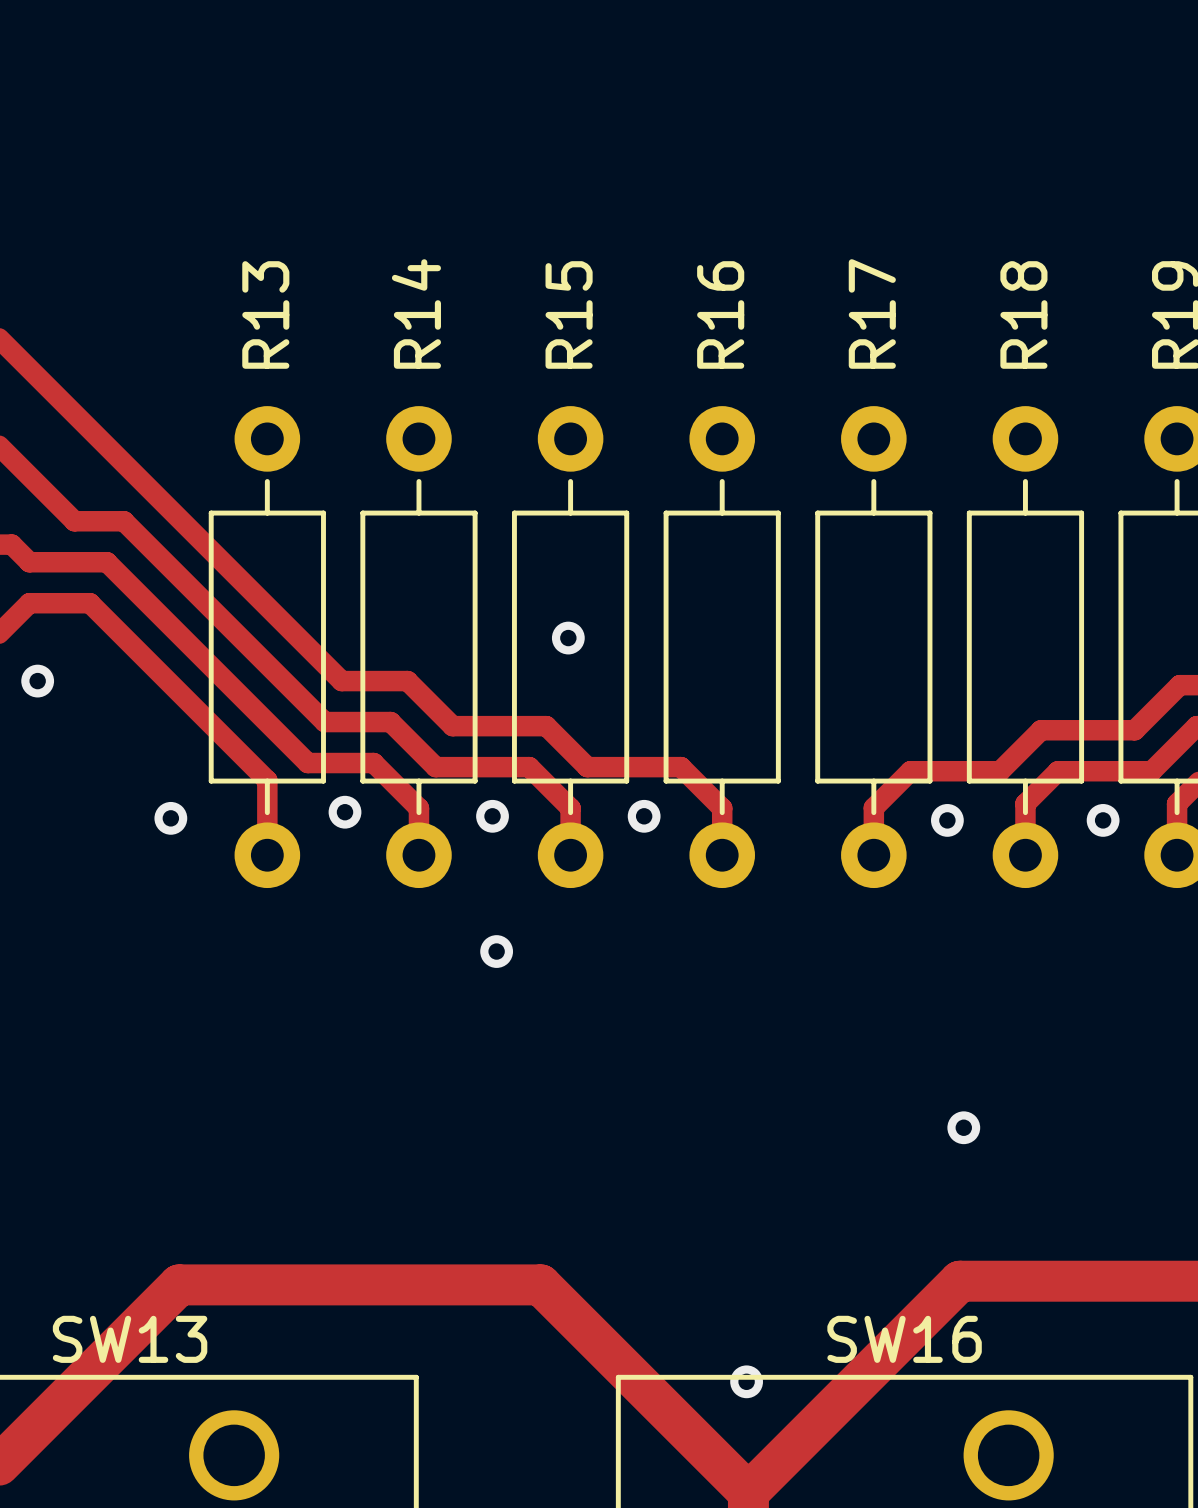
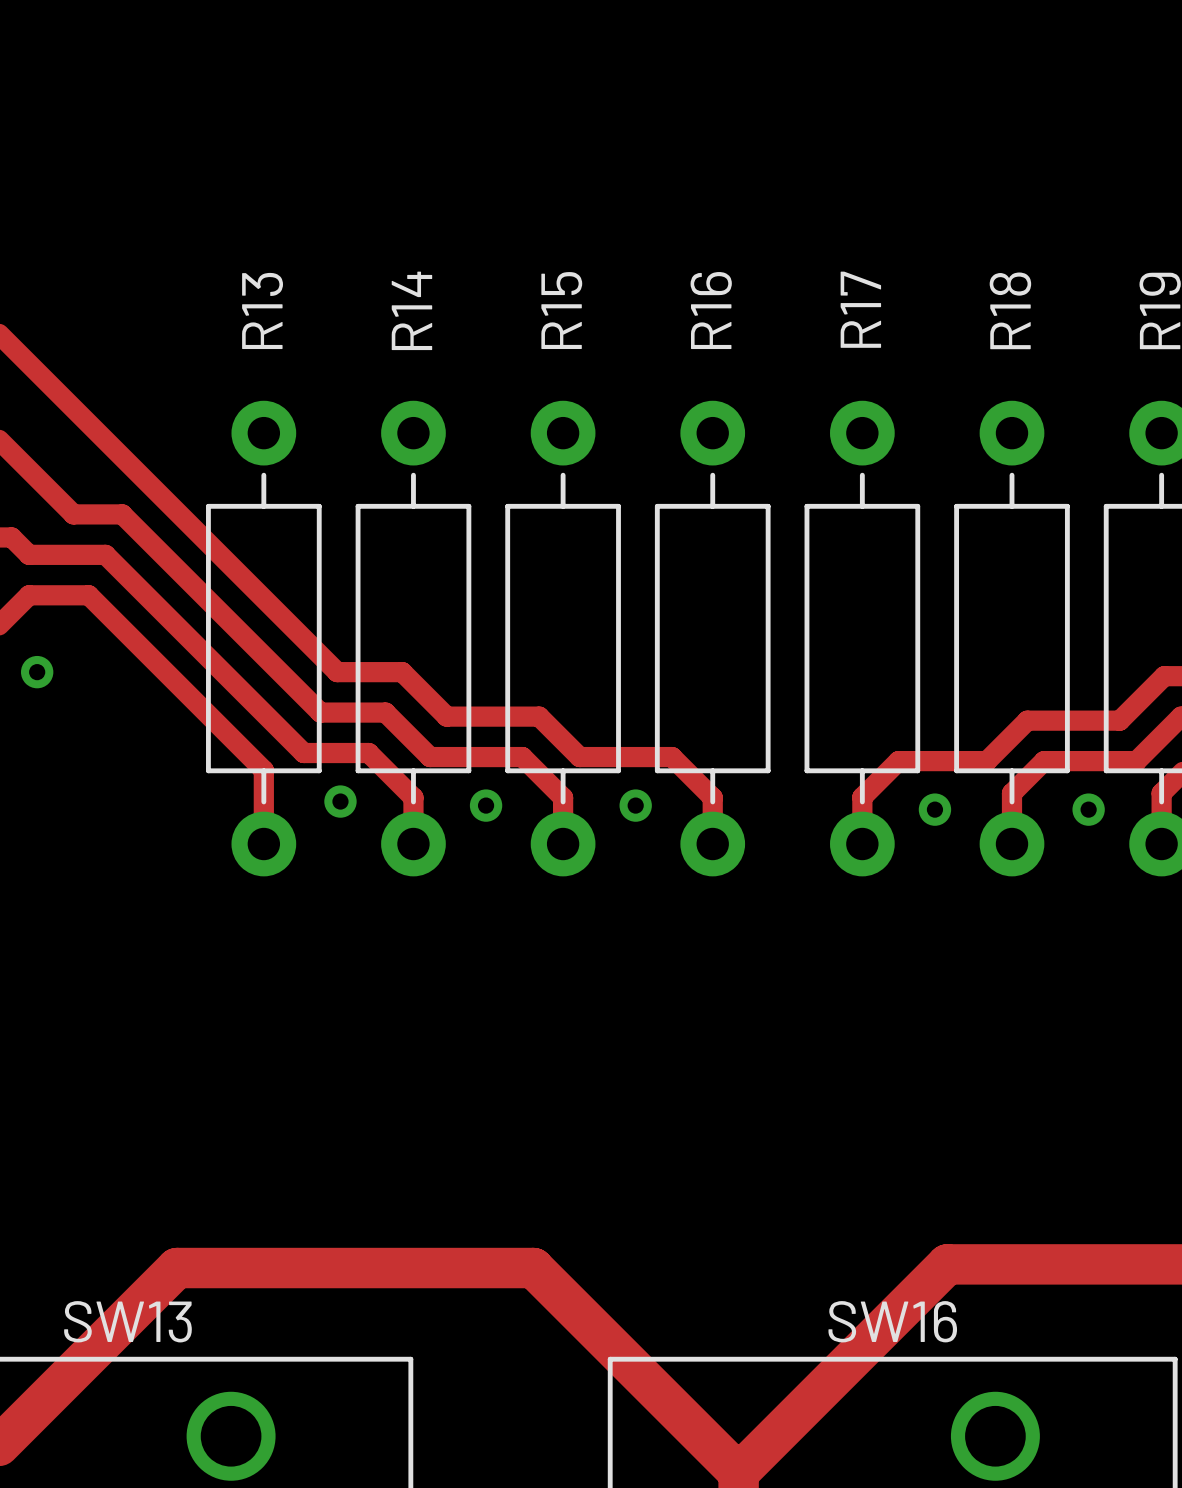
via: (568, 638) -> none
via: (170, 818) -> none
via: (496, 951) -> none
via: (963, 1127) -> none
via: (746, 1381) -> none

